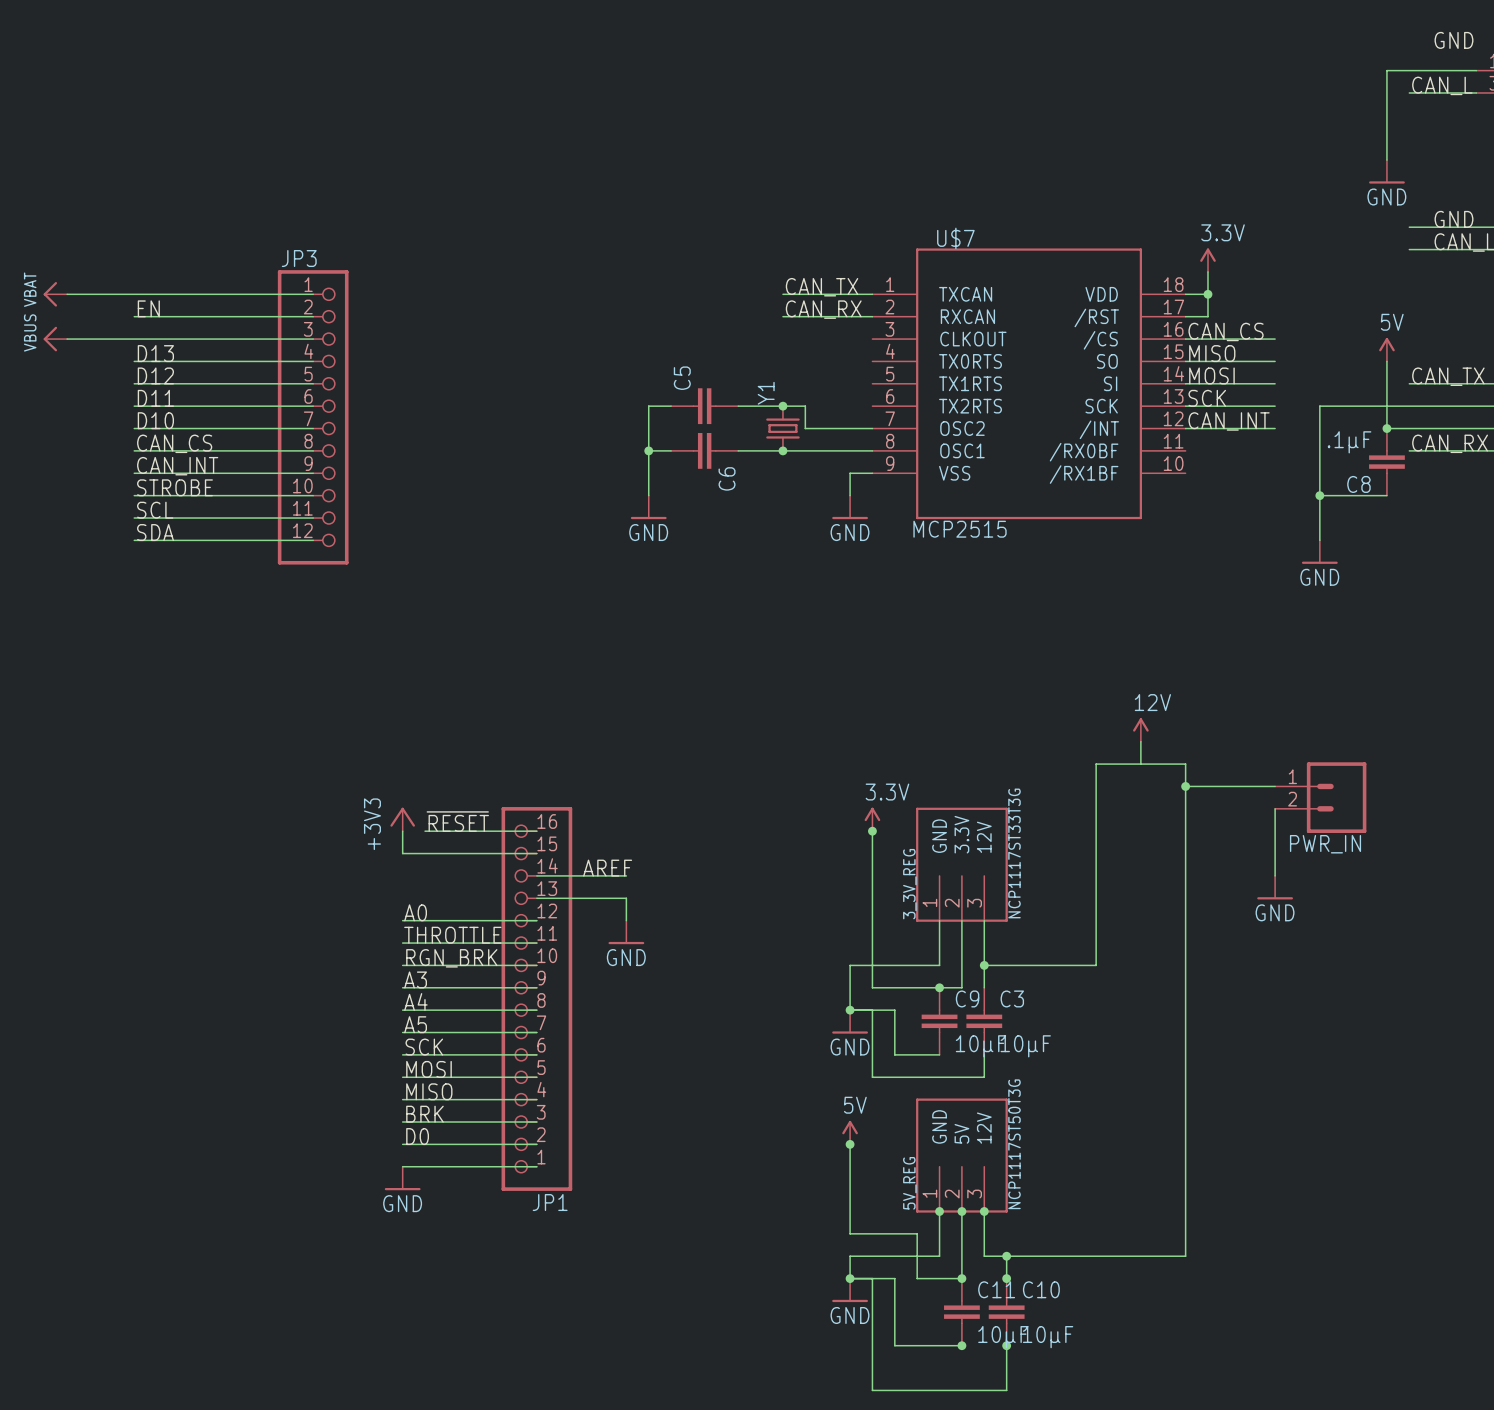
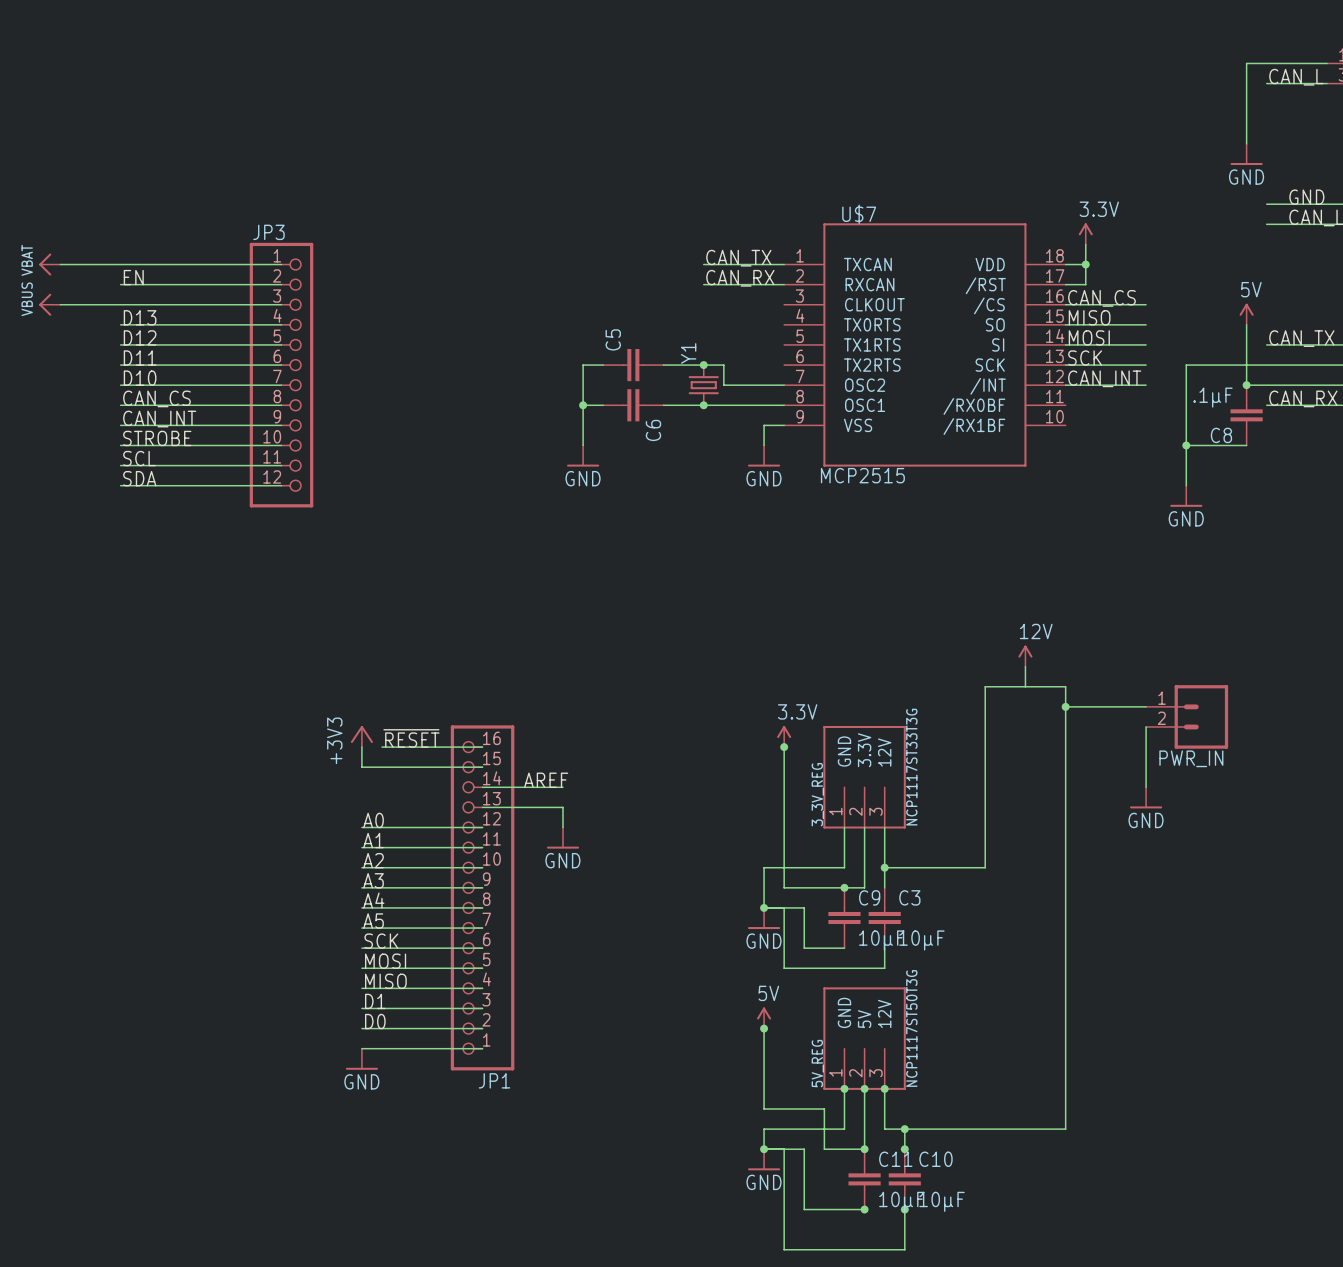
label: GND (1453, 40) -> none
label: THROTTLE (452, 935) -> A1 (373, 840)
label: RGN_BRK (451, 958) -> A2 (373, 860)
label: BRK (424, 1114) -> D1 (375, 1001)

